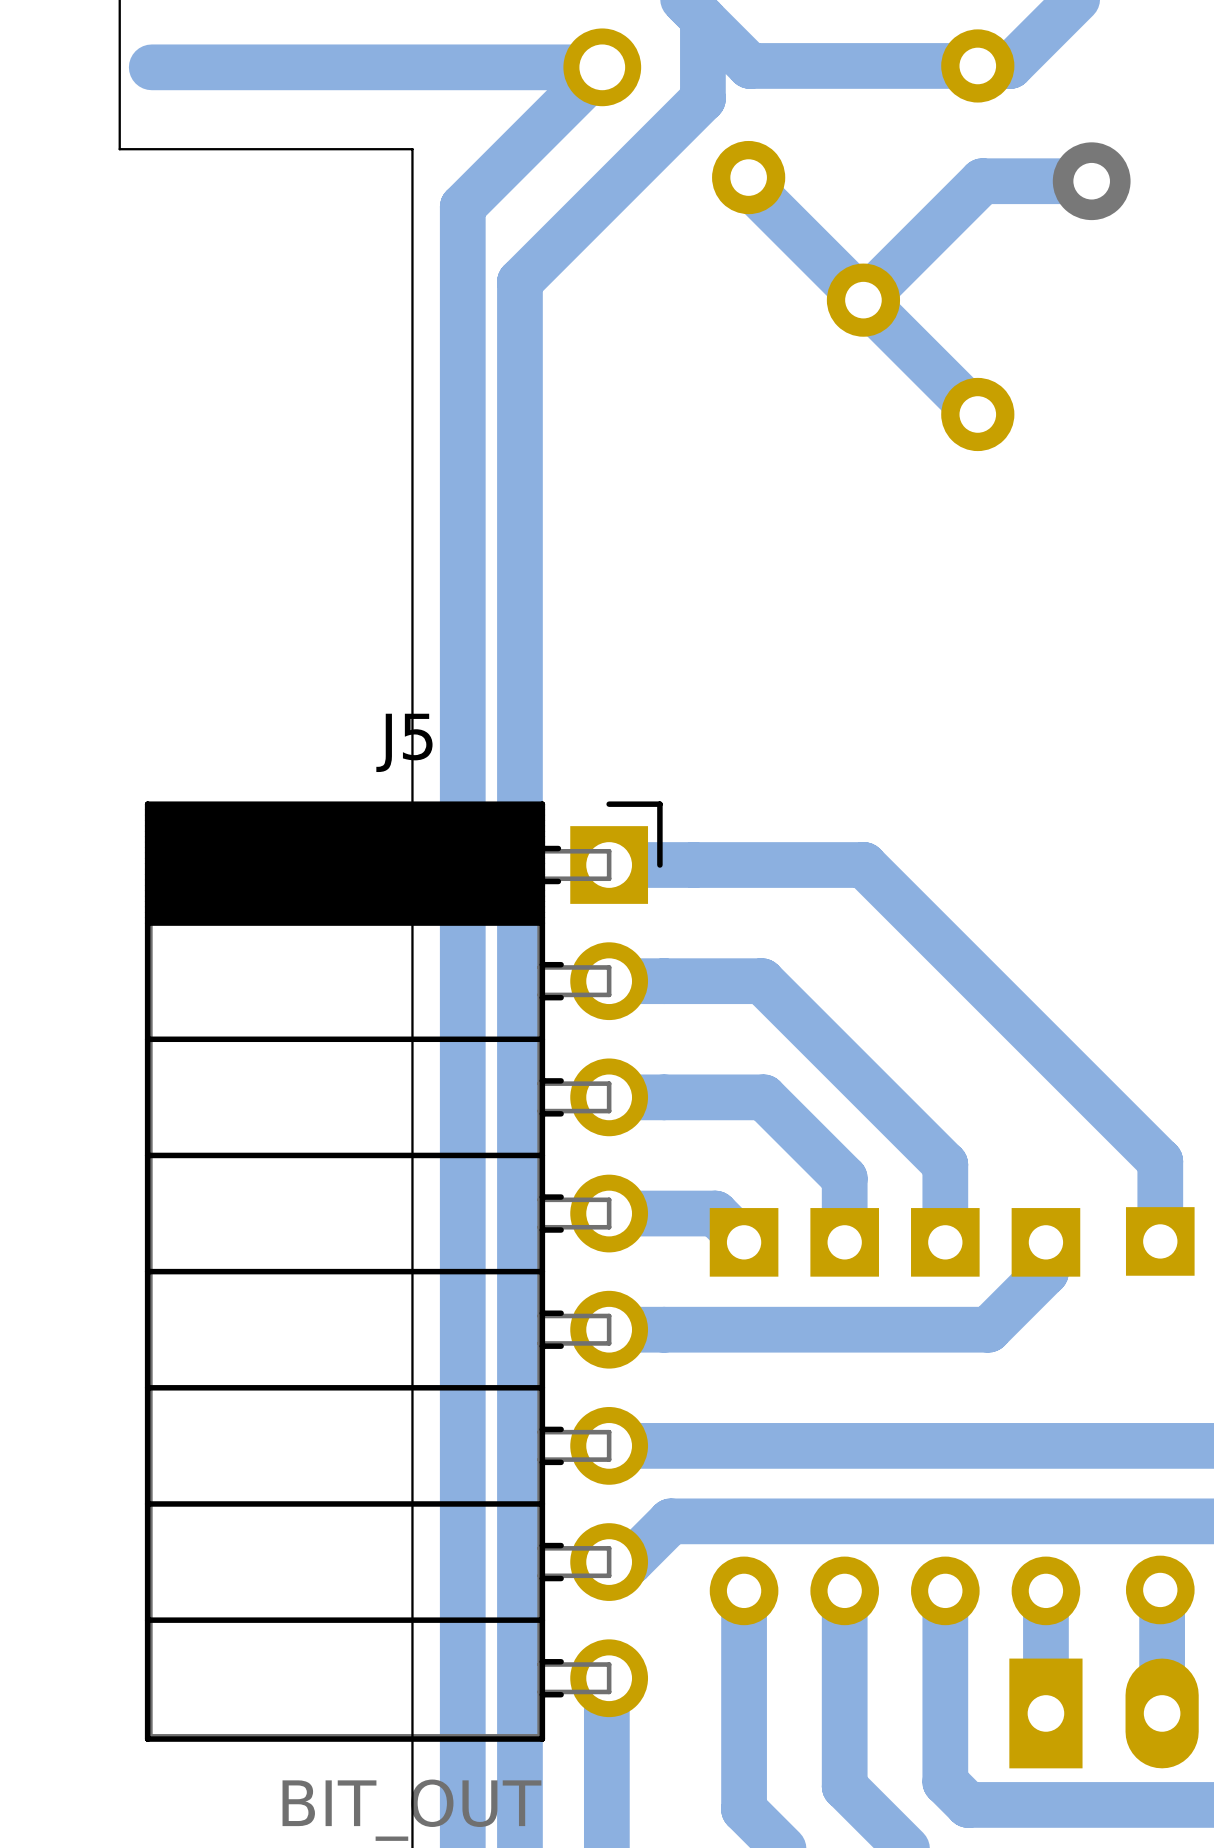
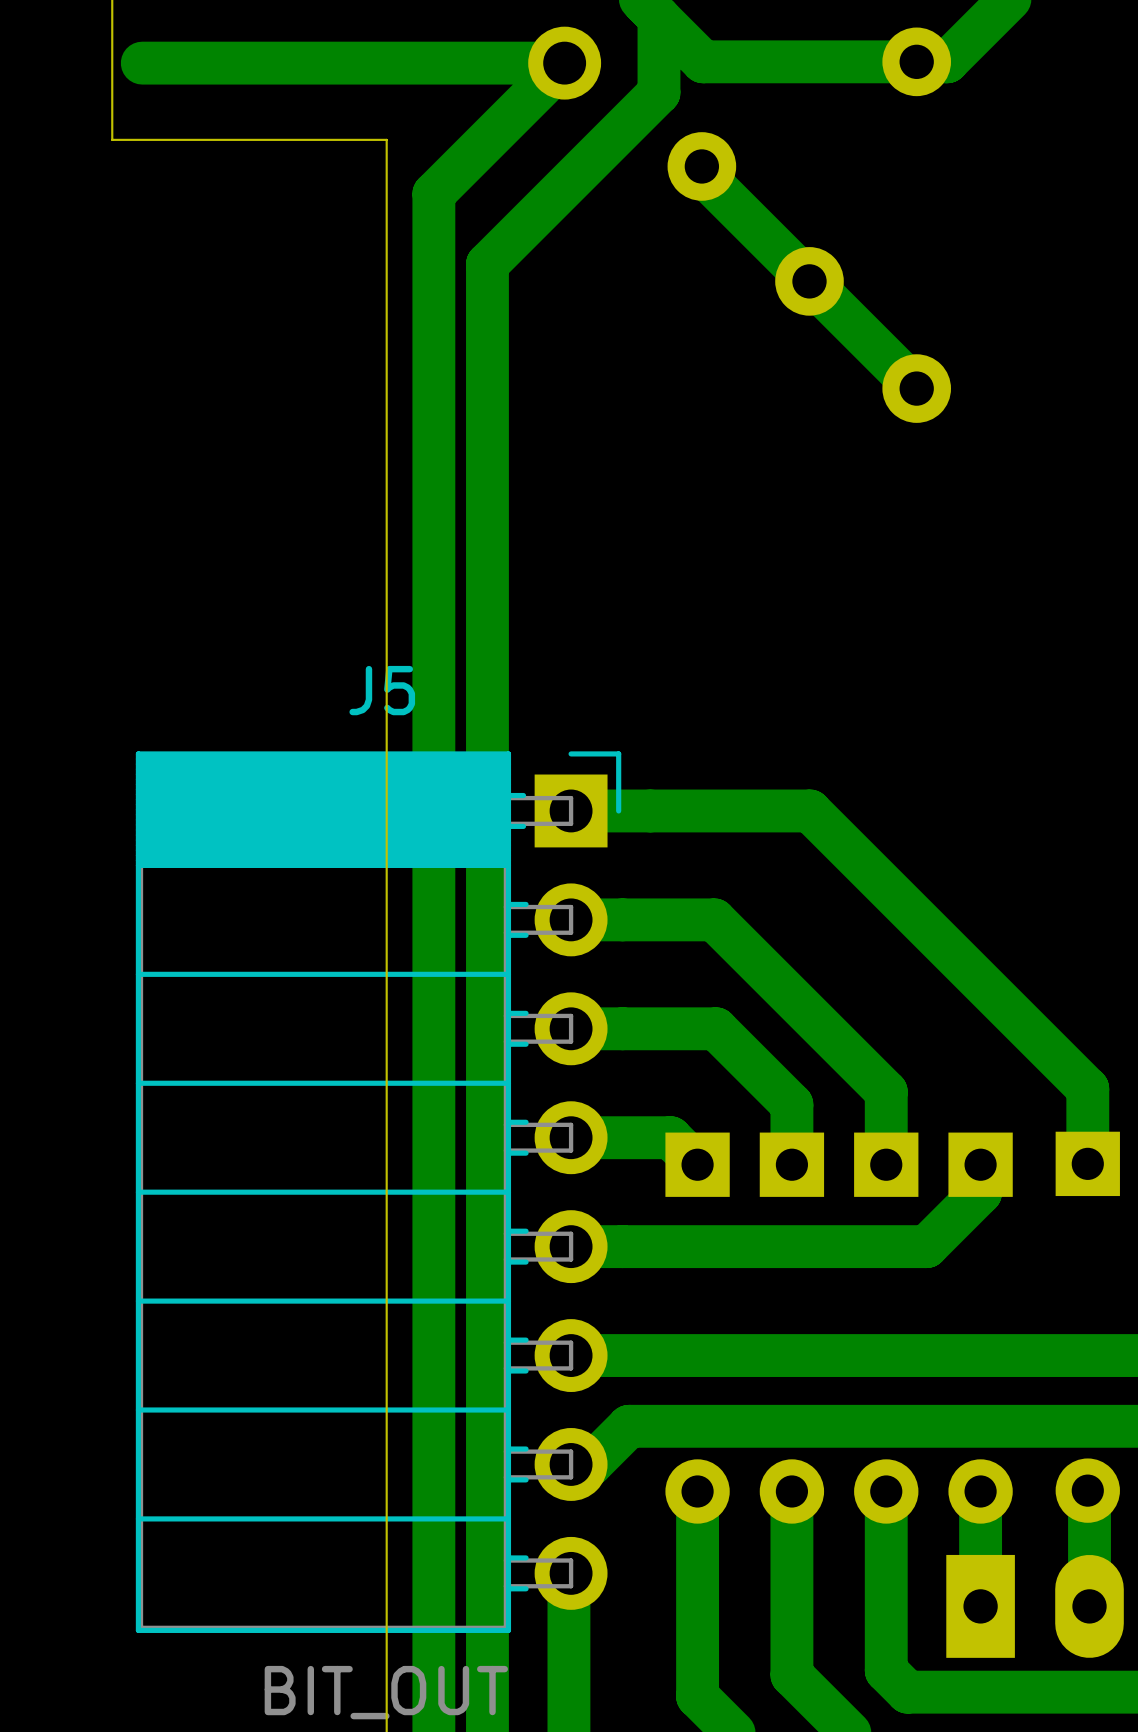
track: (1091, 181) (982, 181) (863, 300) -> none
via: (1091, 181) -> none

